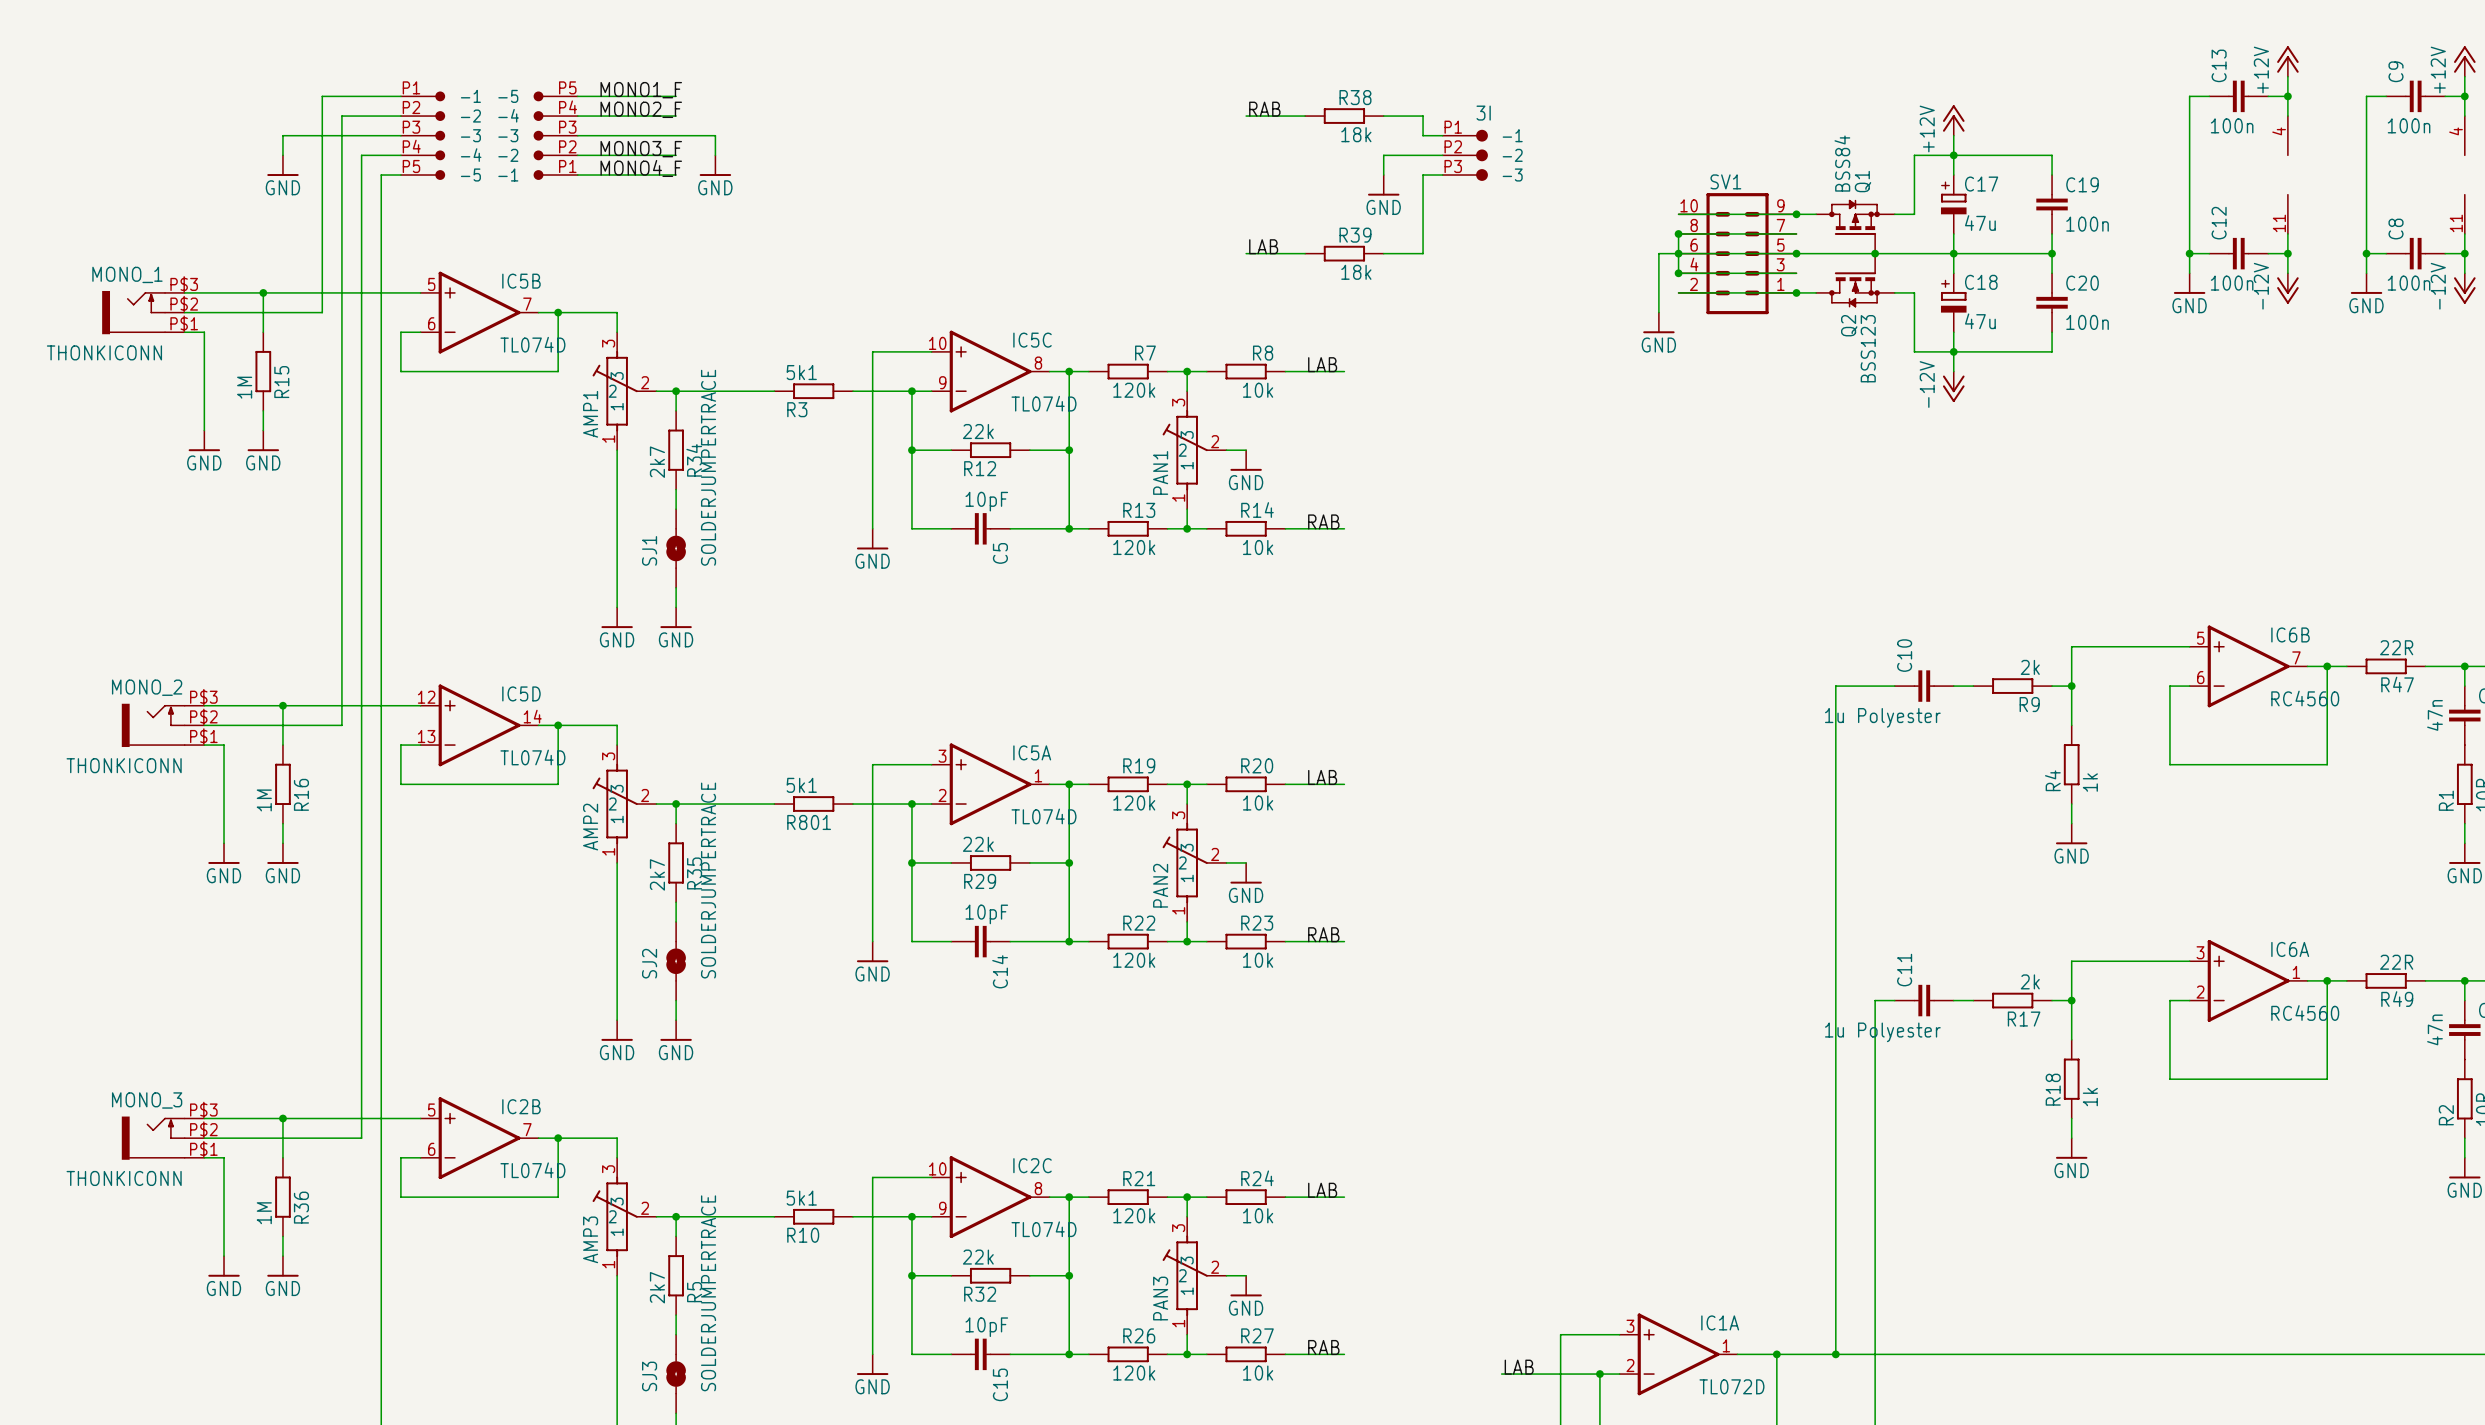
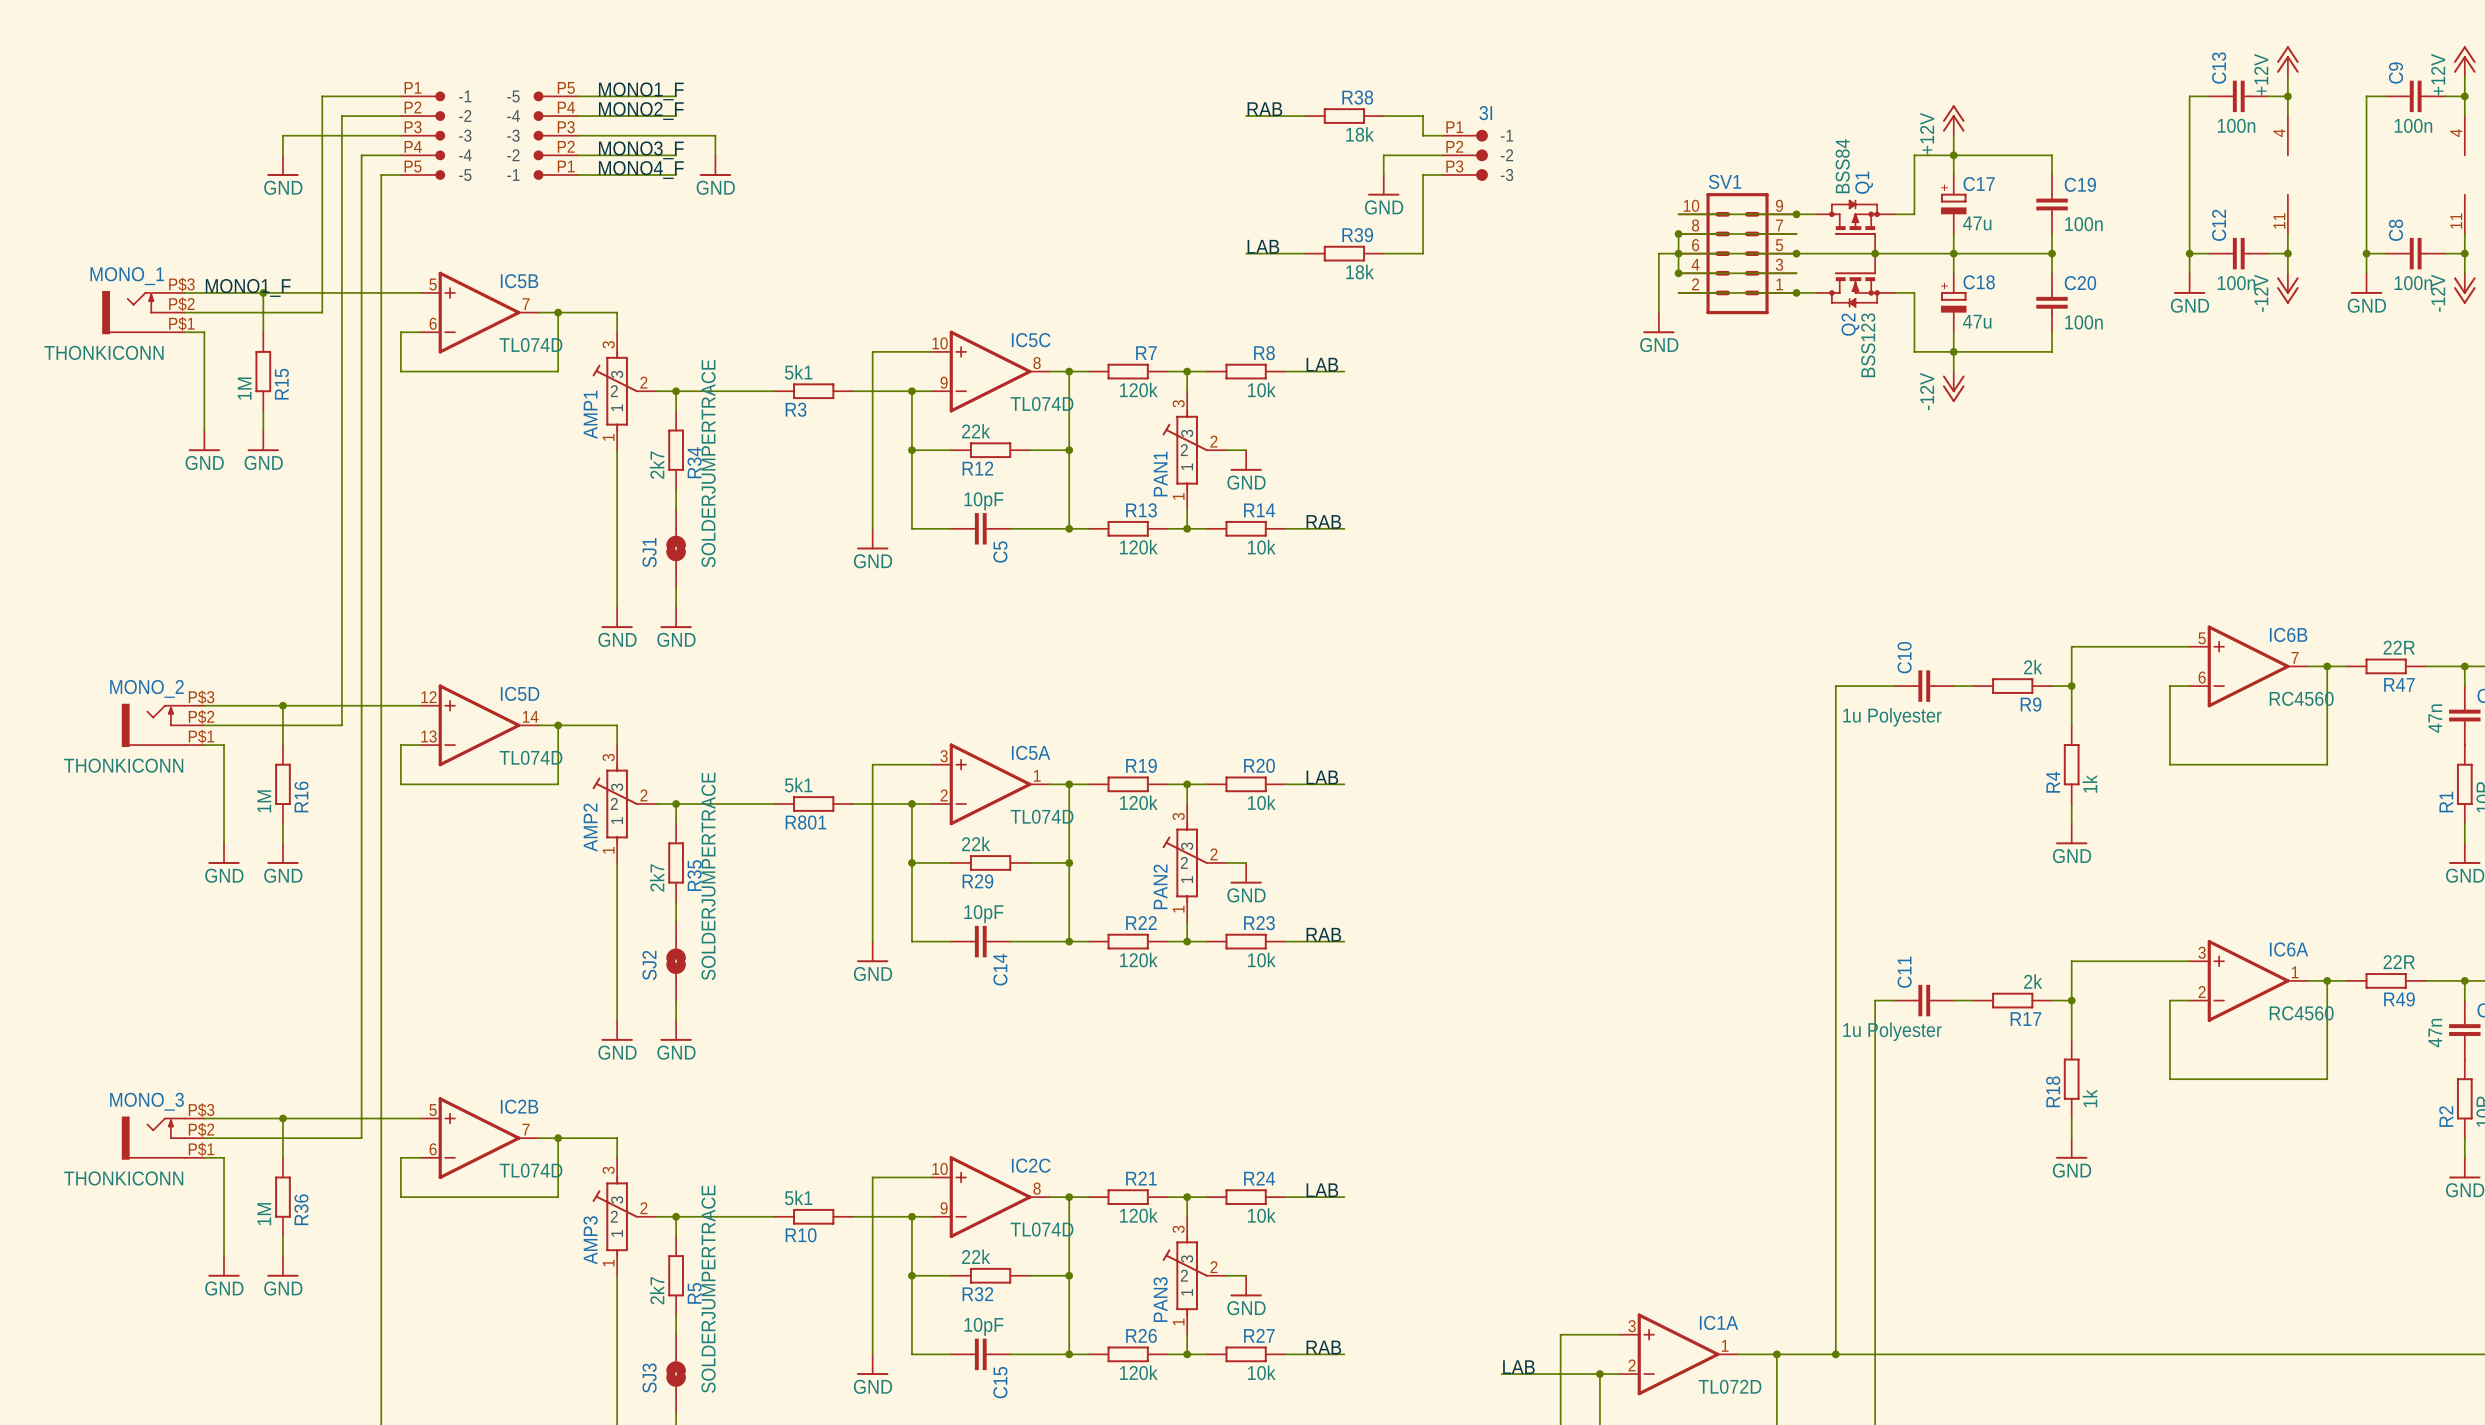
label: none -> MONO1_F (248, 287)

